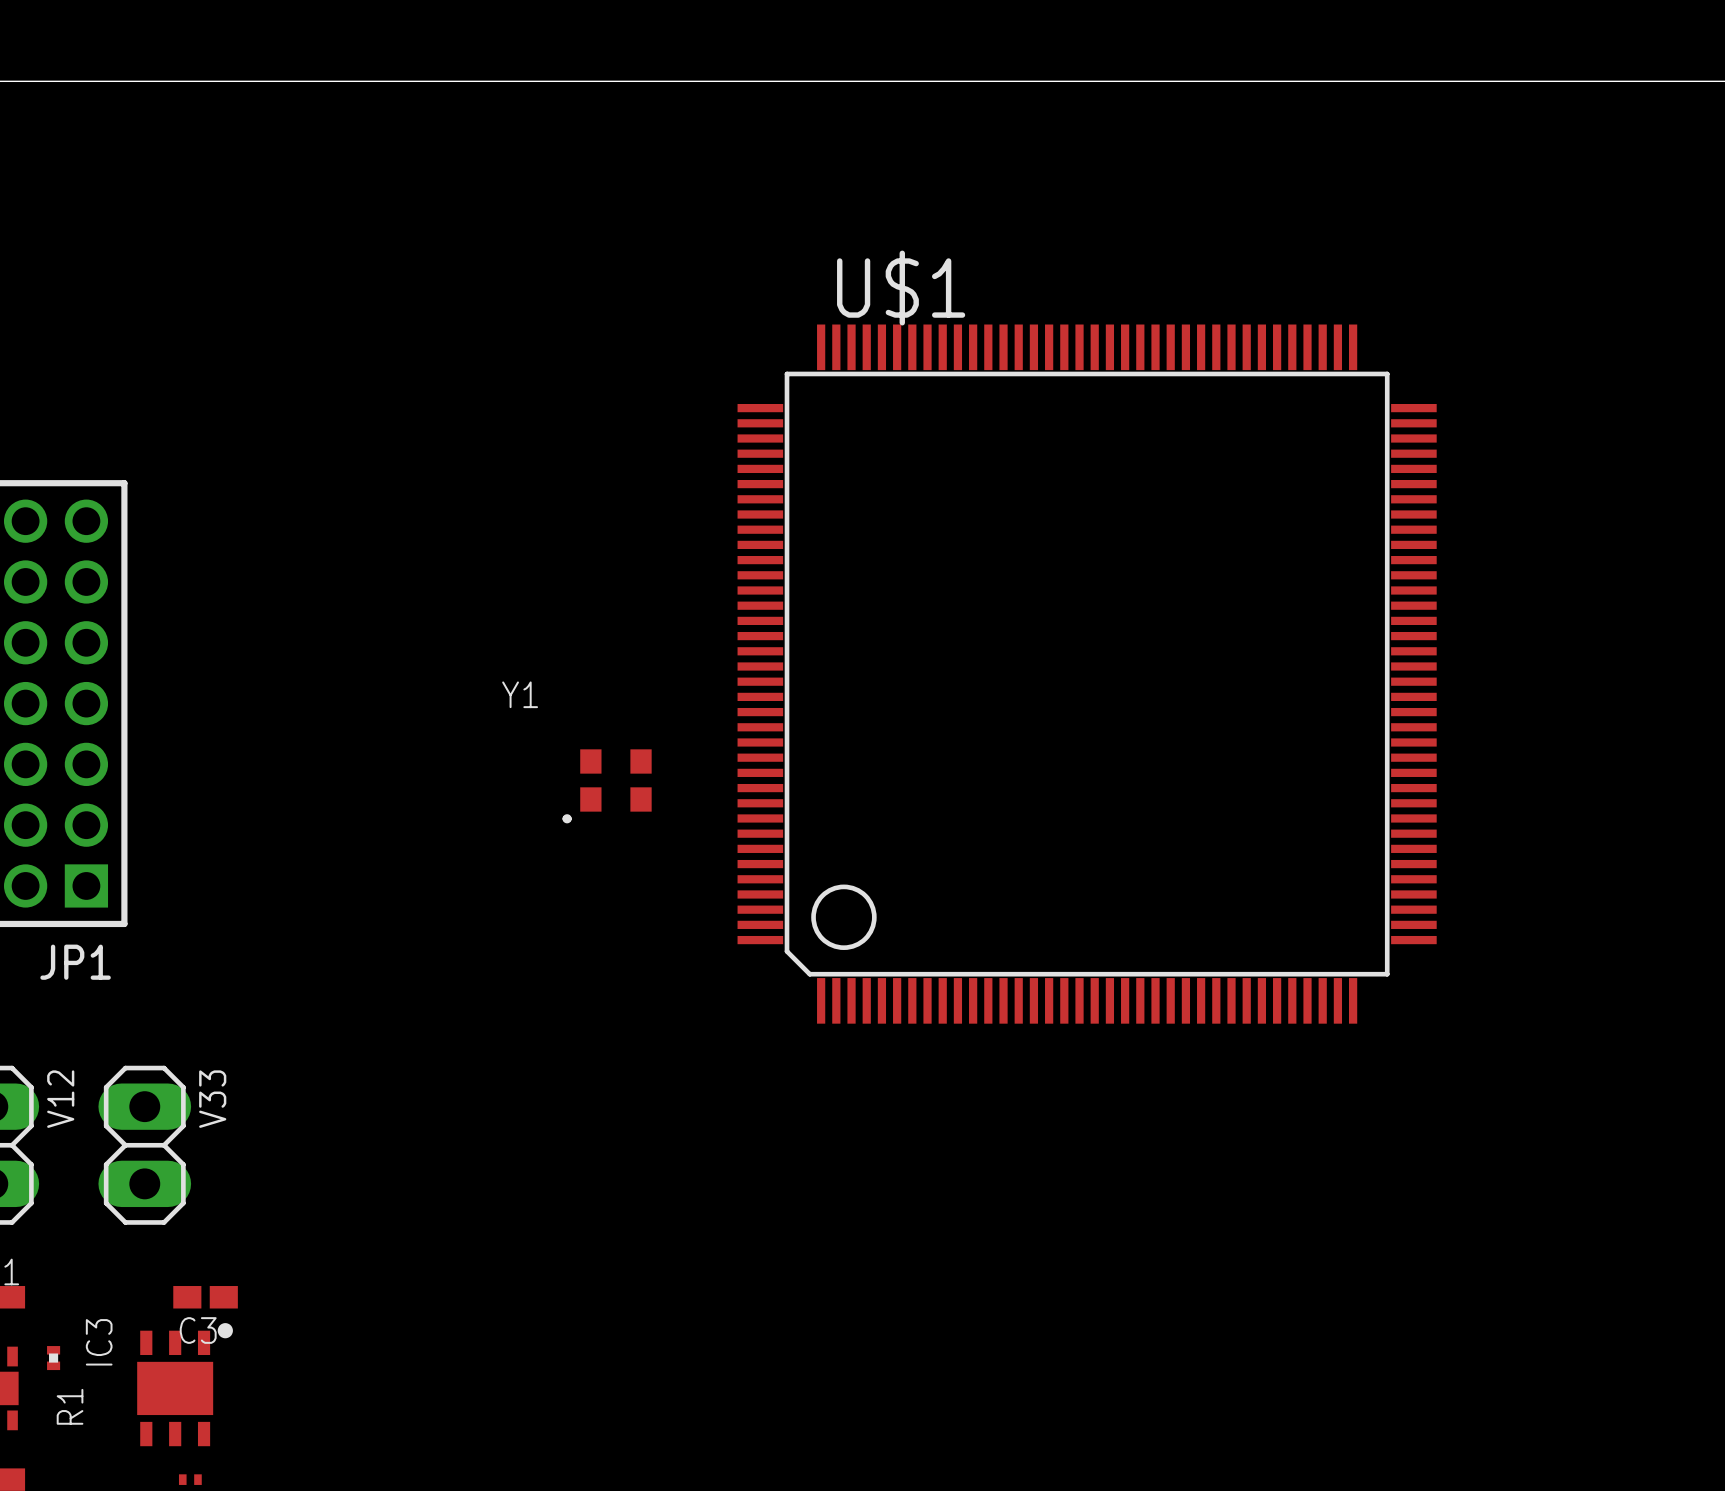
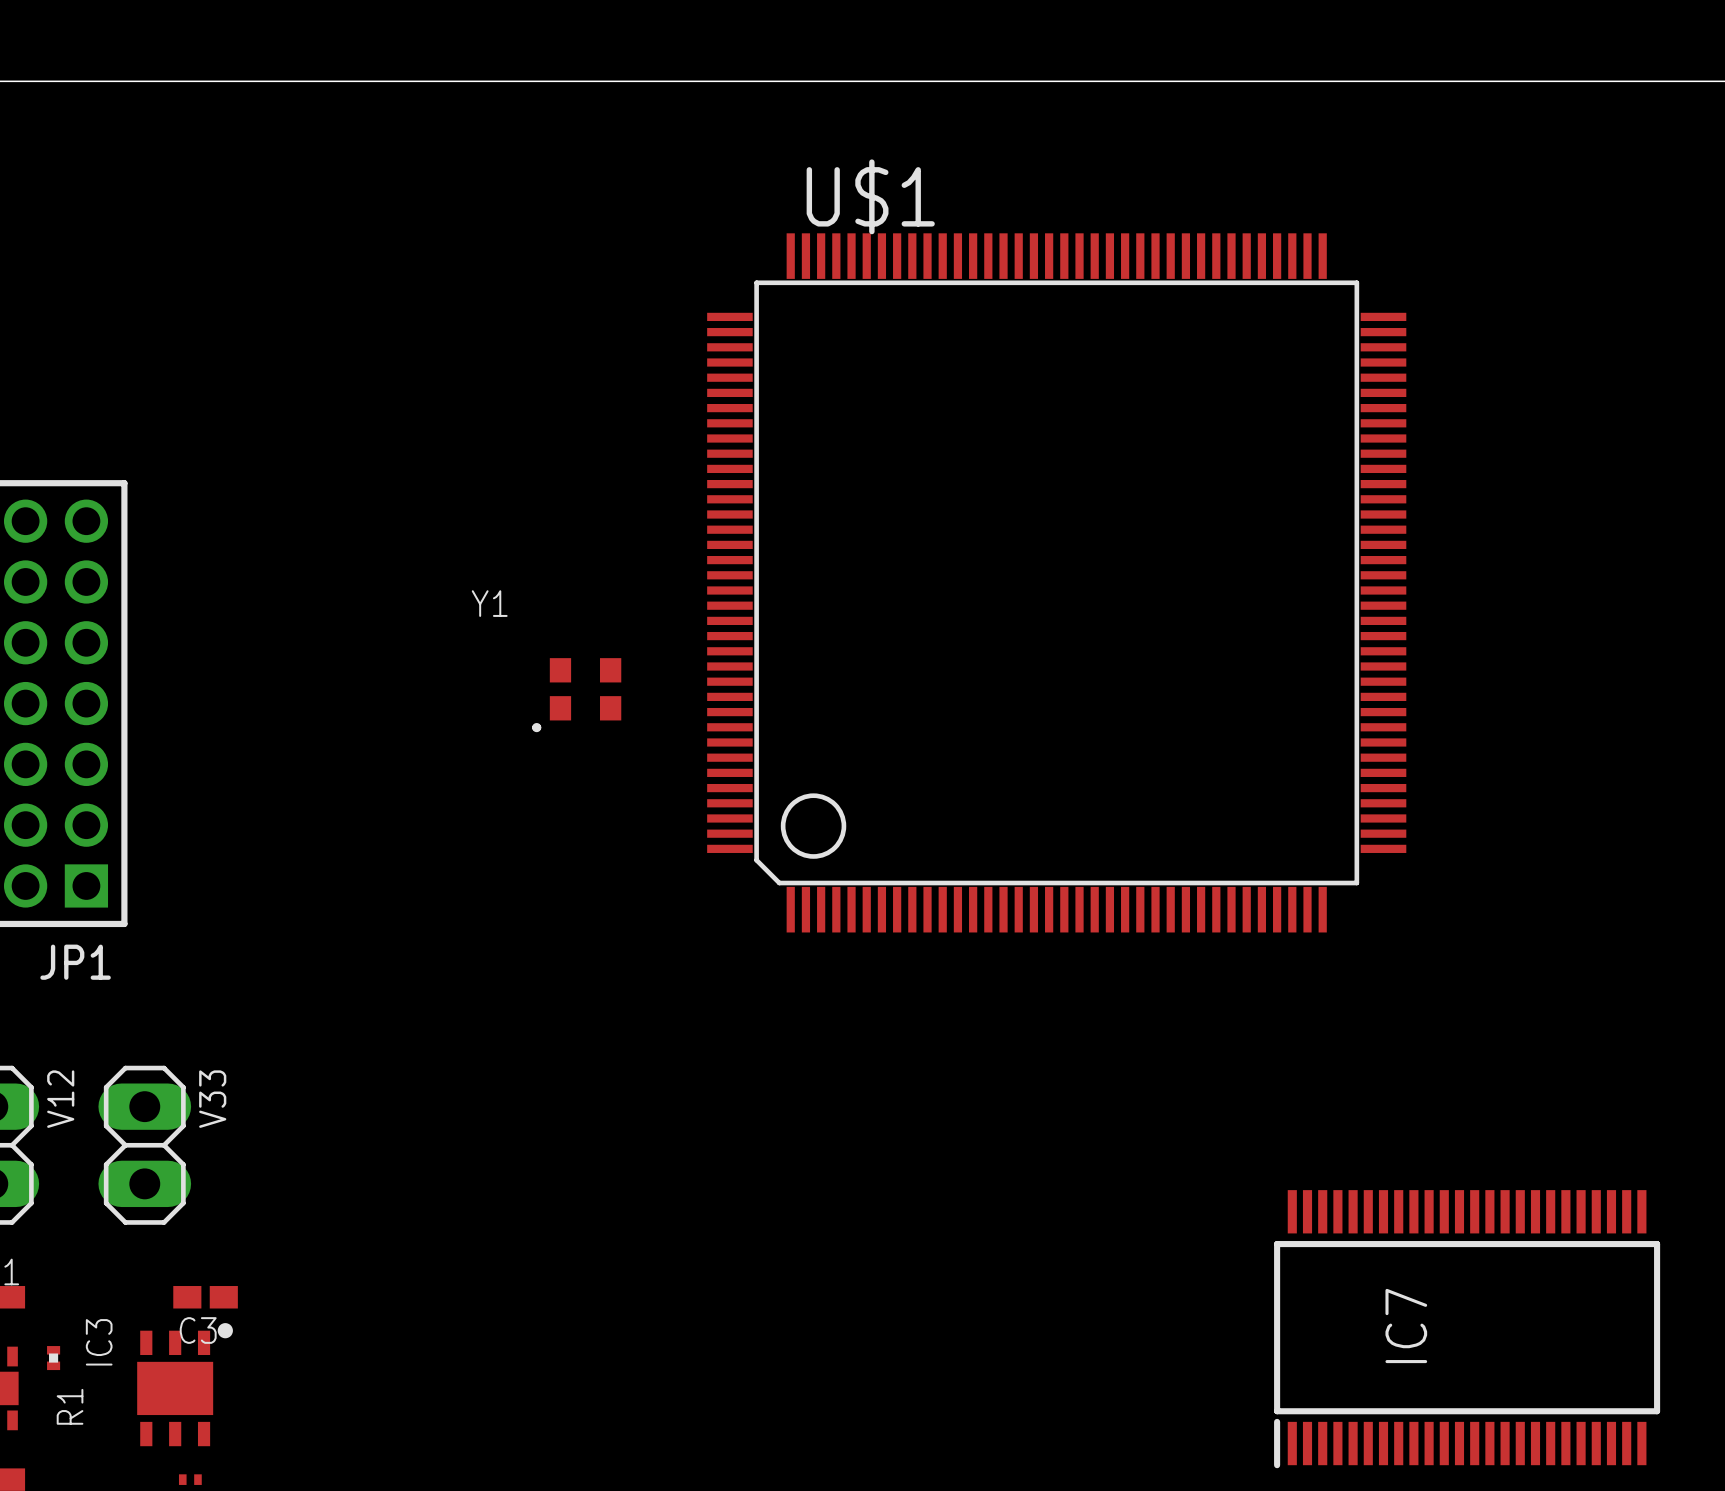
U$1 position: (1087, 674) -> (1056, 582)
Y1 position: (607, 786) -> (576, 695)
IC7: none -> (1467, 1329)

